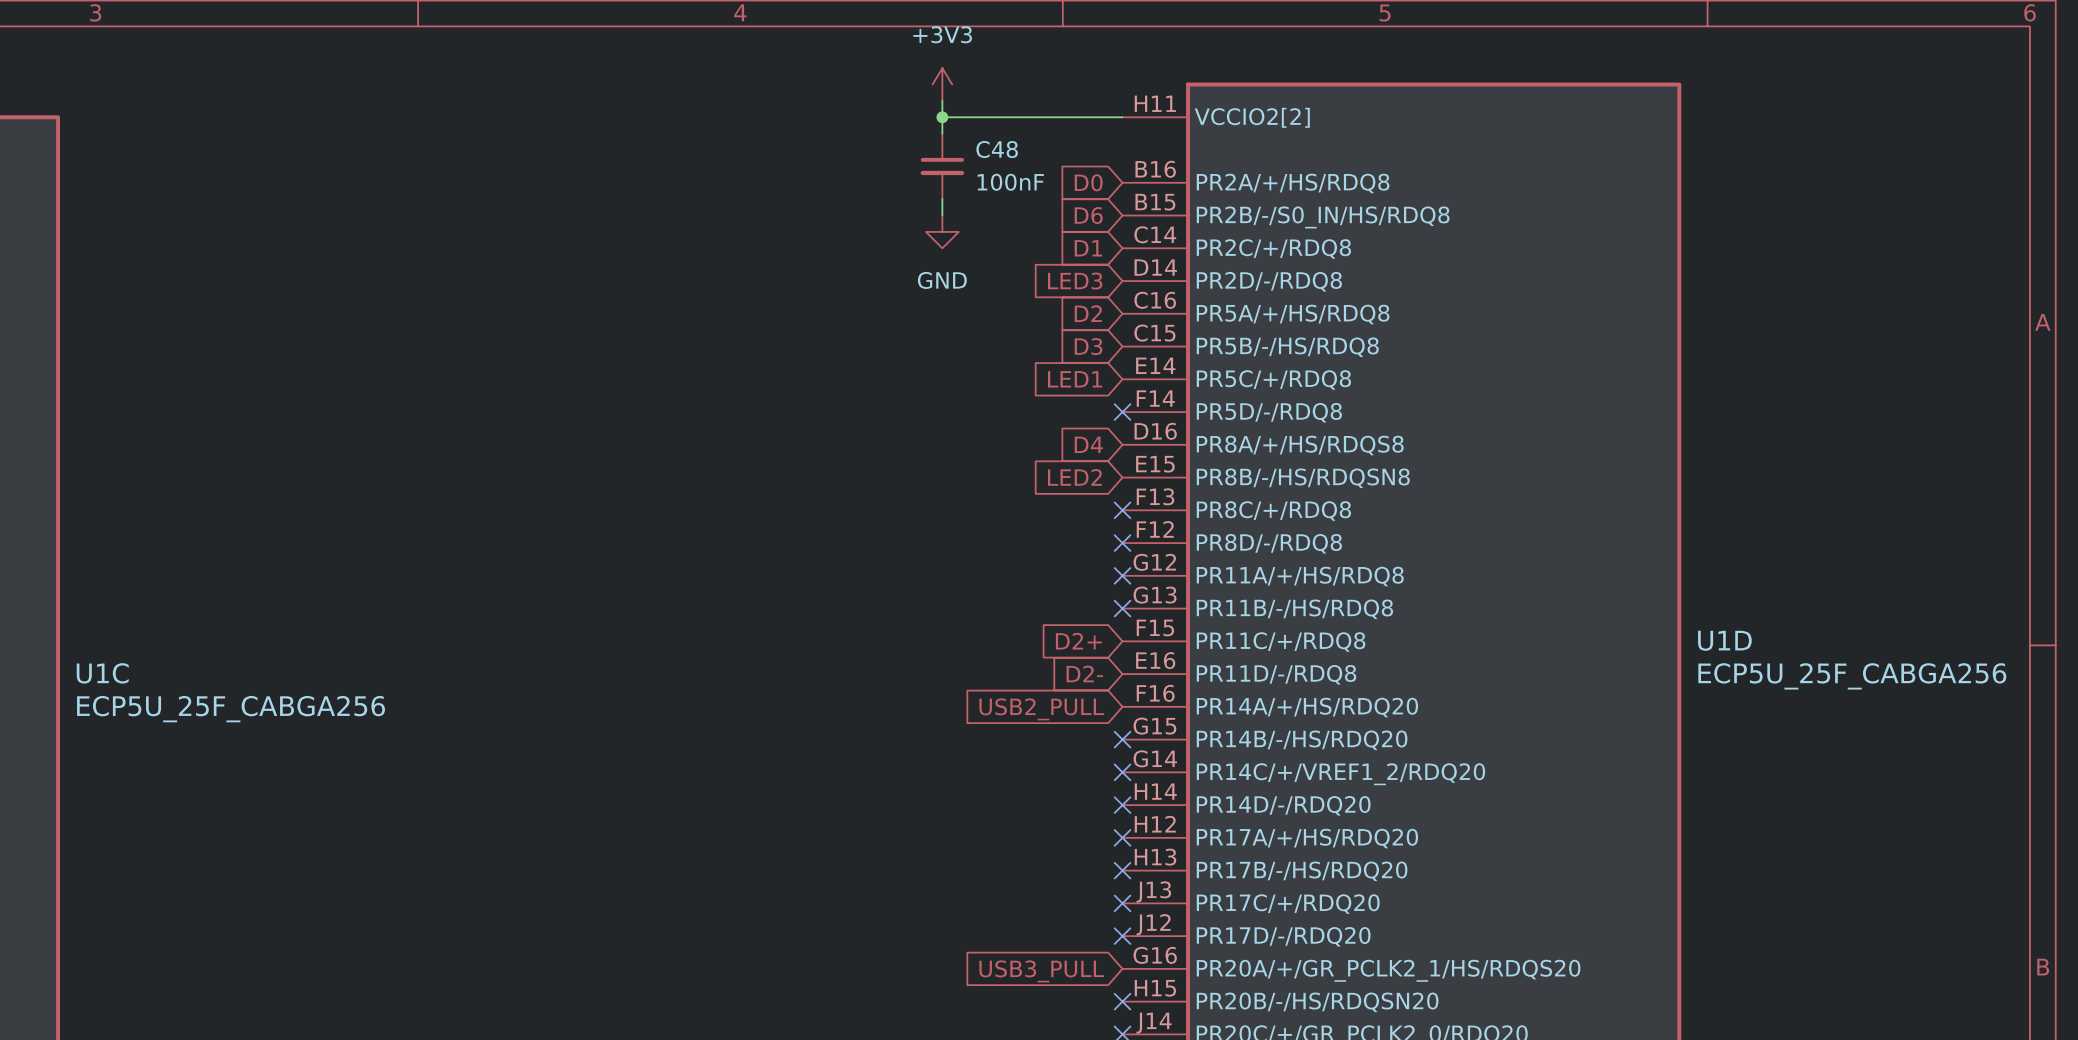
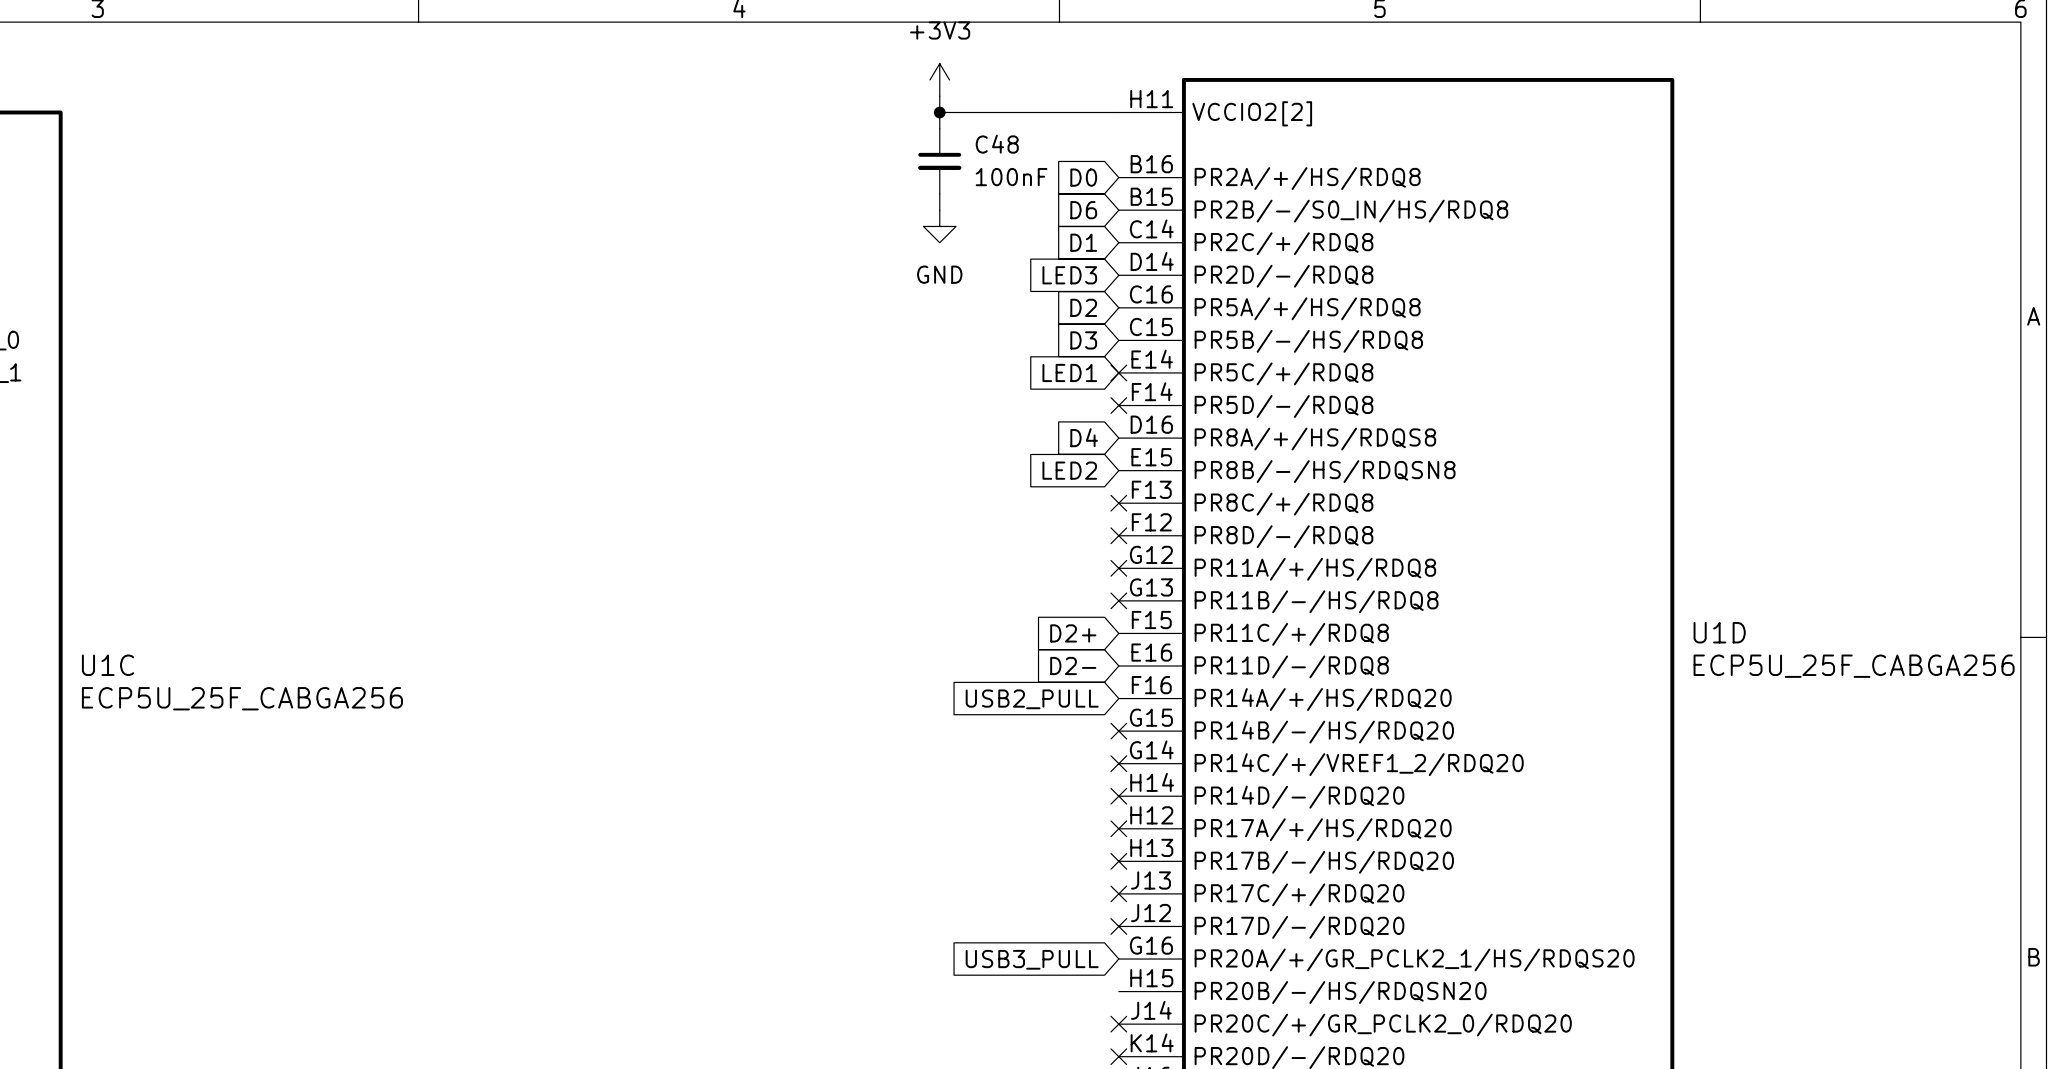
no-connect mark: none -> (1118, 372)
no-connect mark: (1122, 1001) -> none

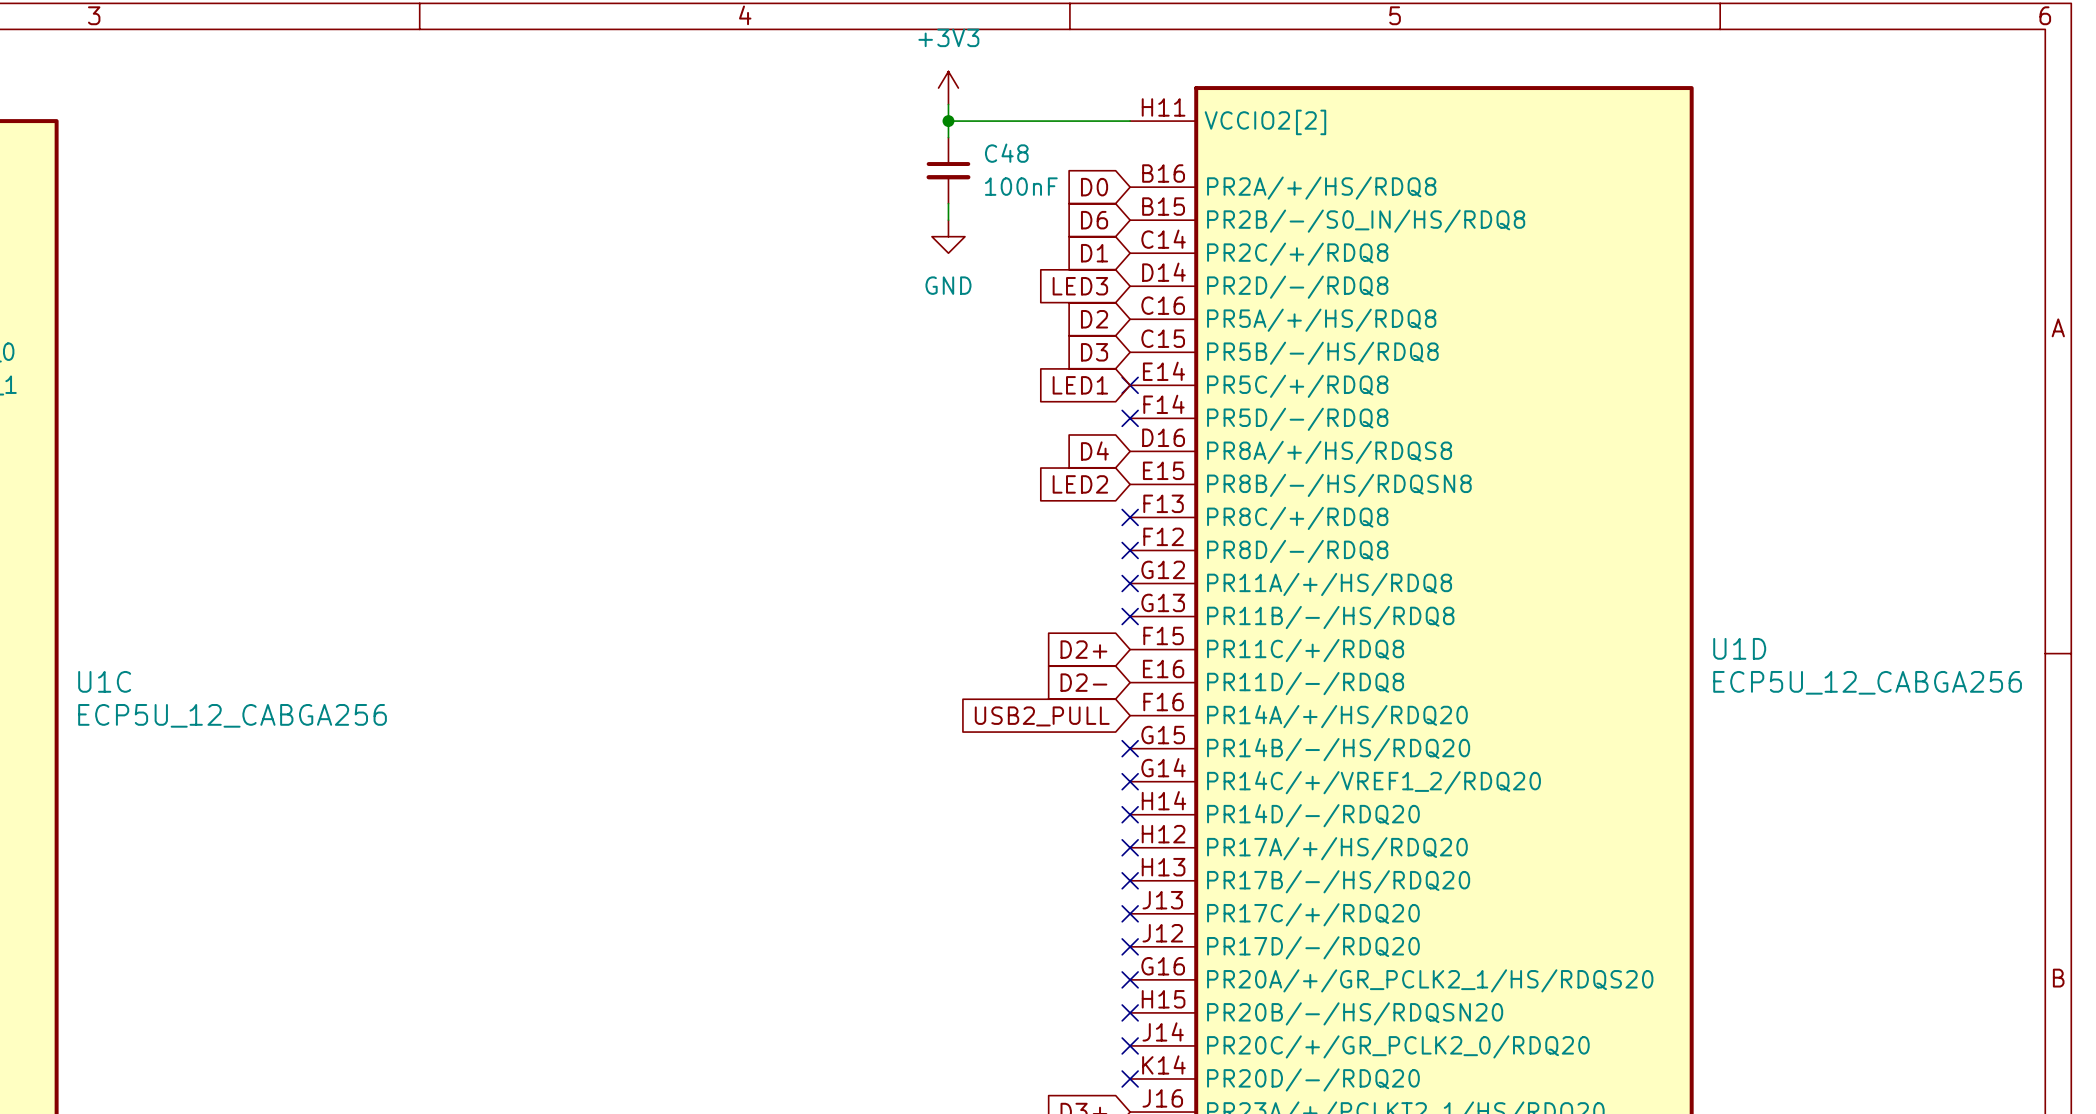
U1D value: ECP5U_25F_CABGA256 (1854, 666) -> ECP5U_12_CABGA256 (1867, 682)
U1C value: ECP5U_25F_CABGA256 (242, 698) -> ECP5U_12_CABGA256 (232, 715)
global label: USB3_PULL (1032, 959) -> none
no-connect mark: none -> (1130, 979)
no-connect mark: none -> (1130, 1012)

